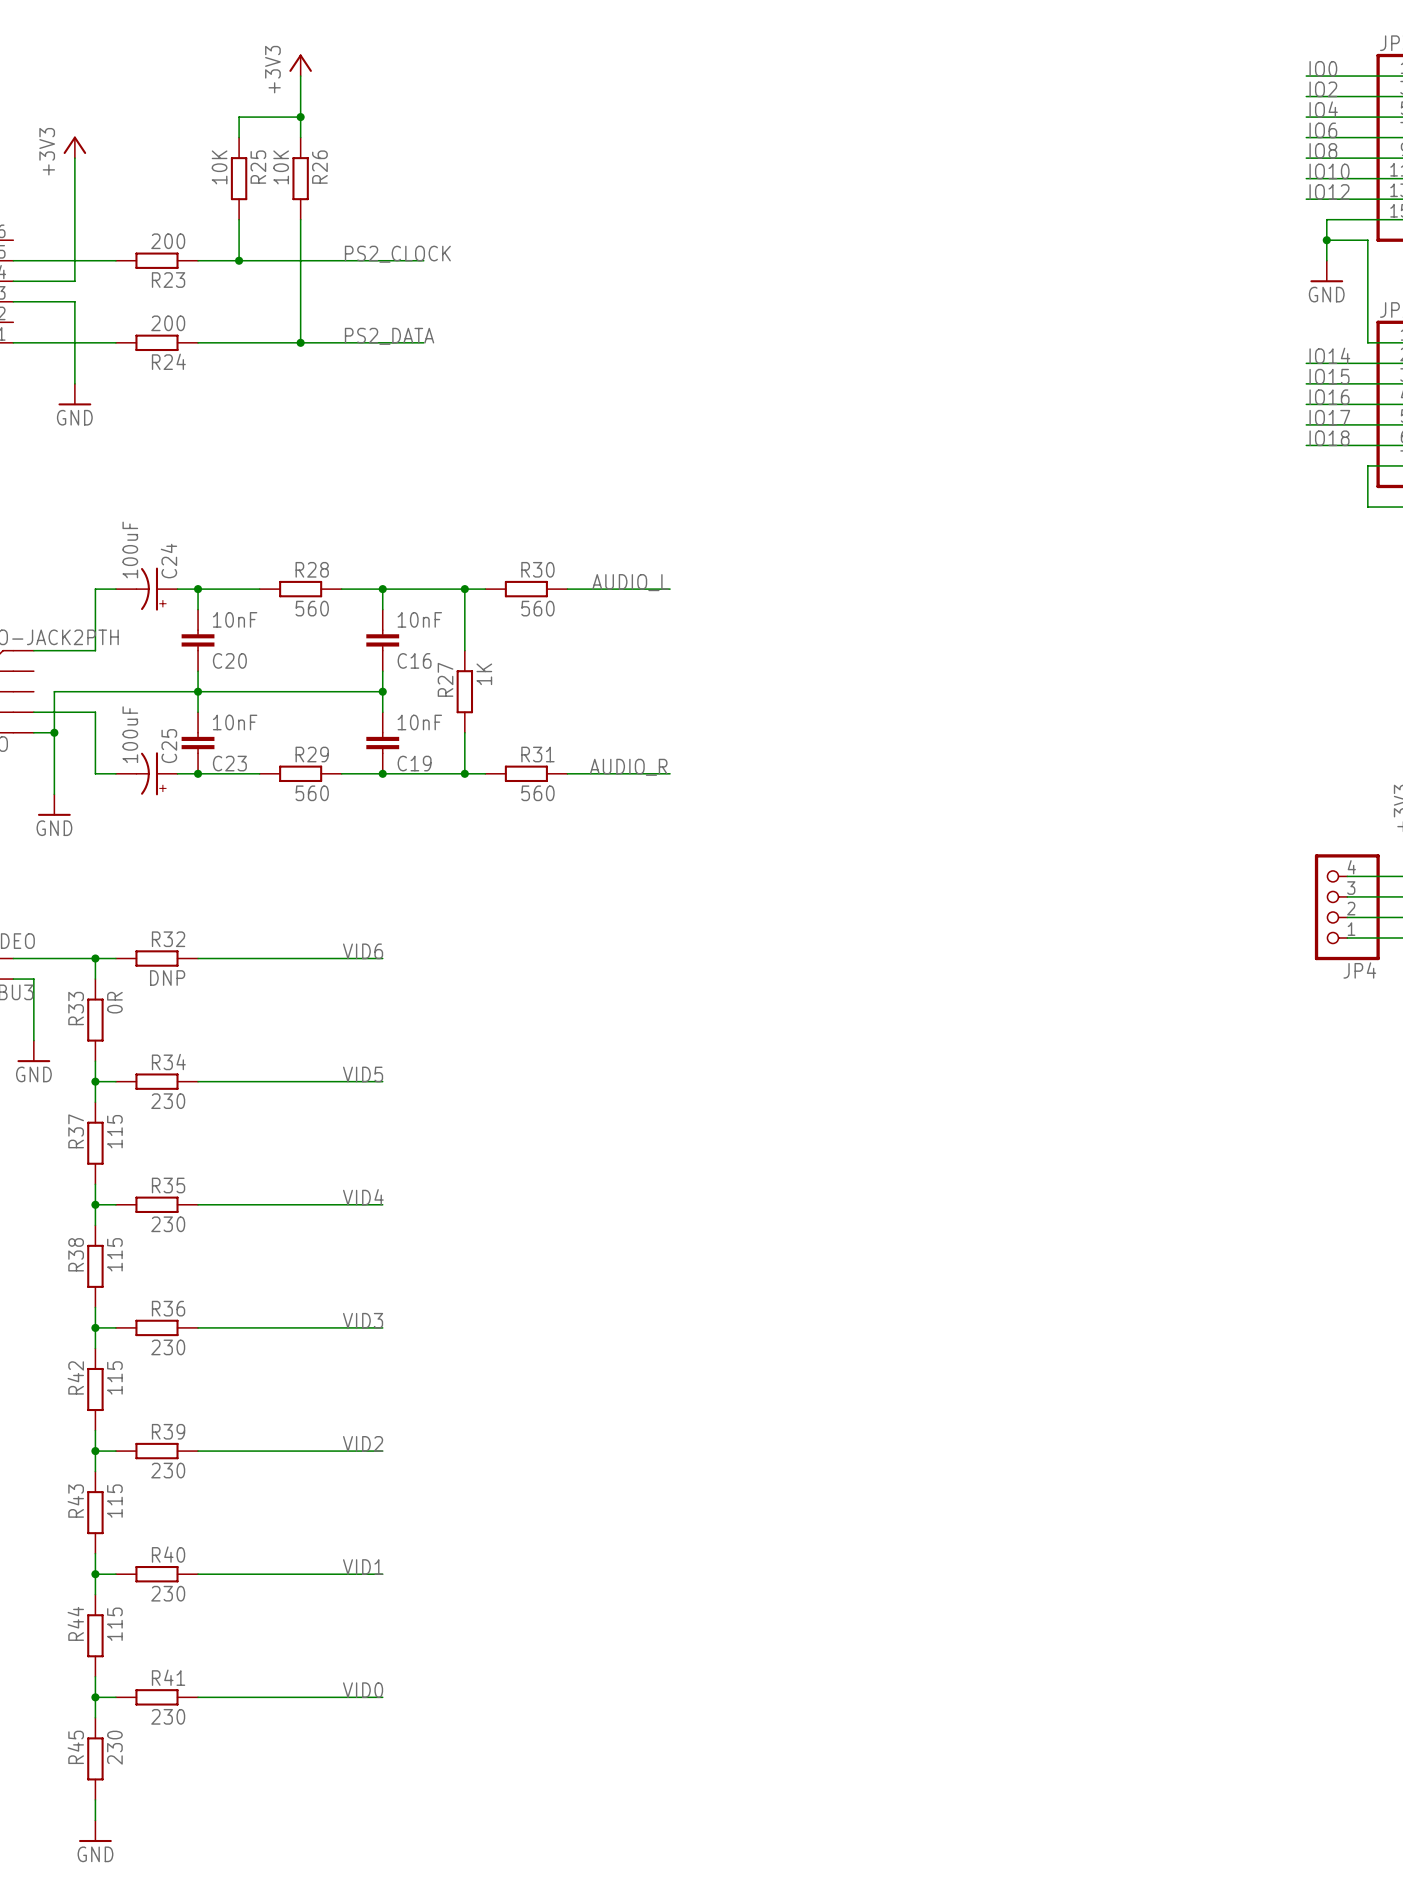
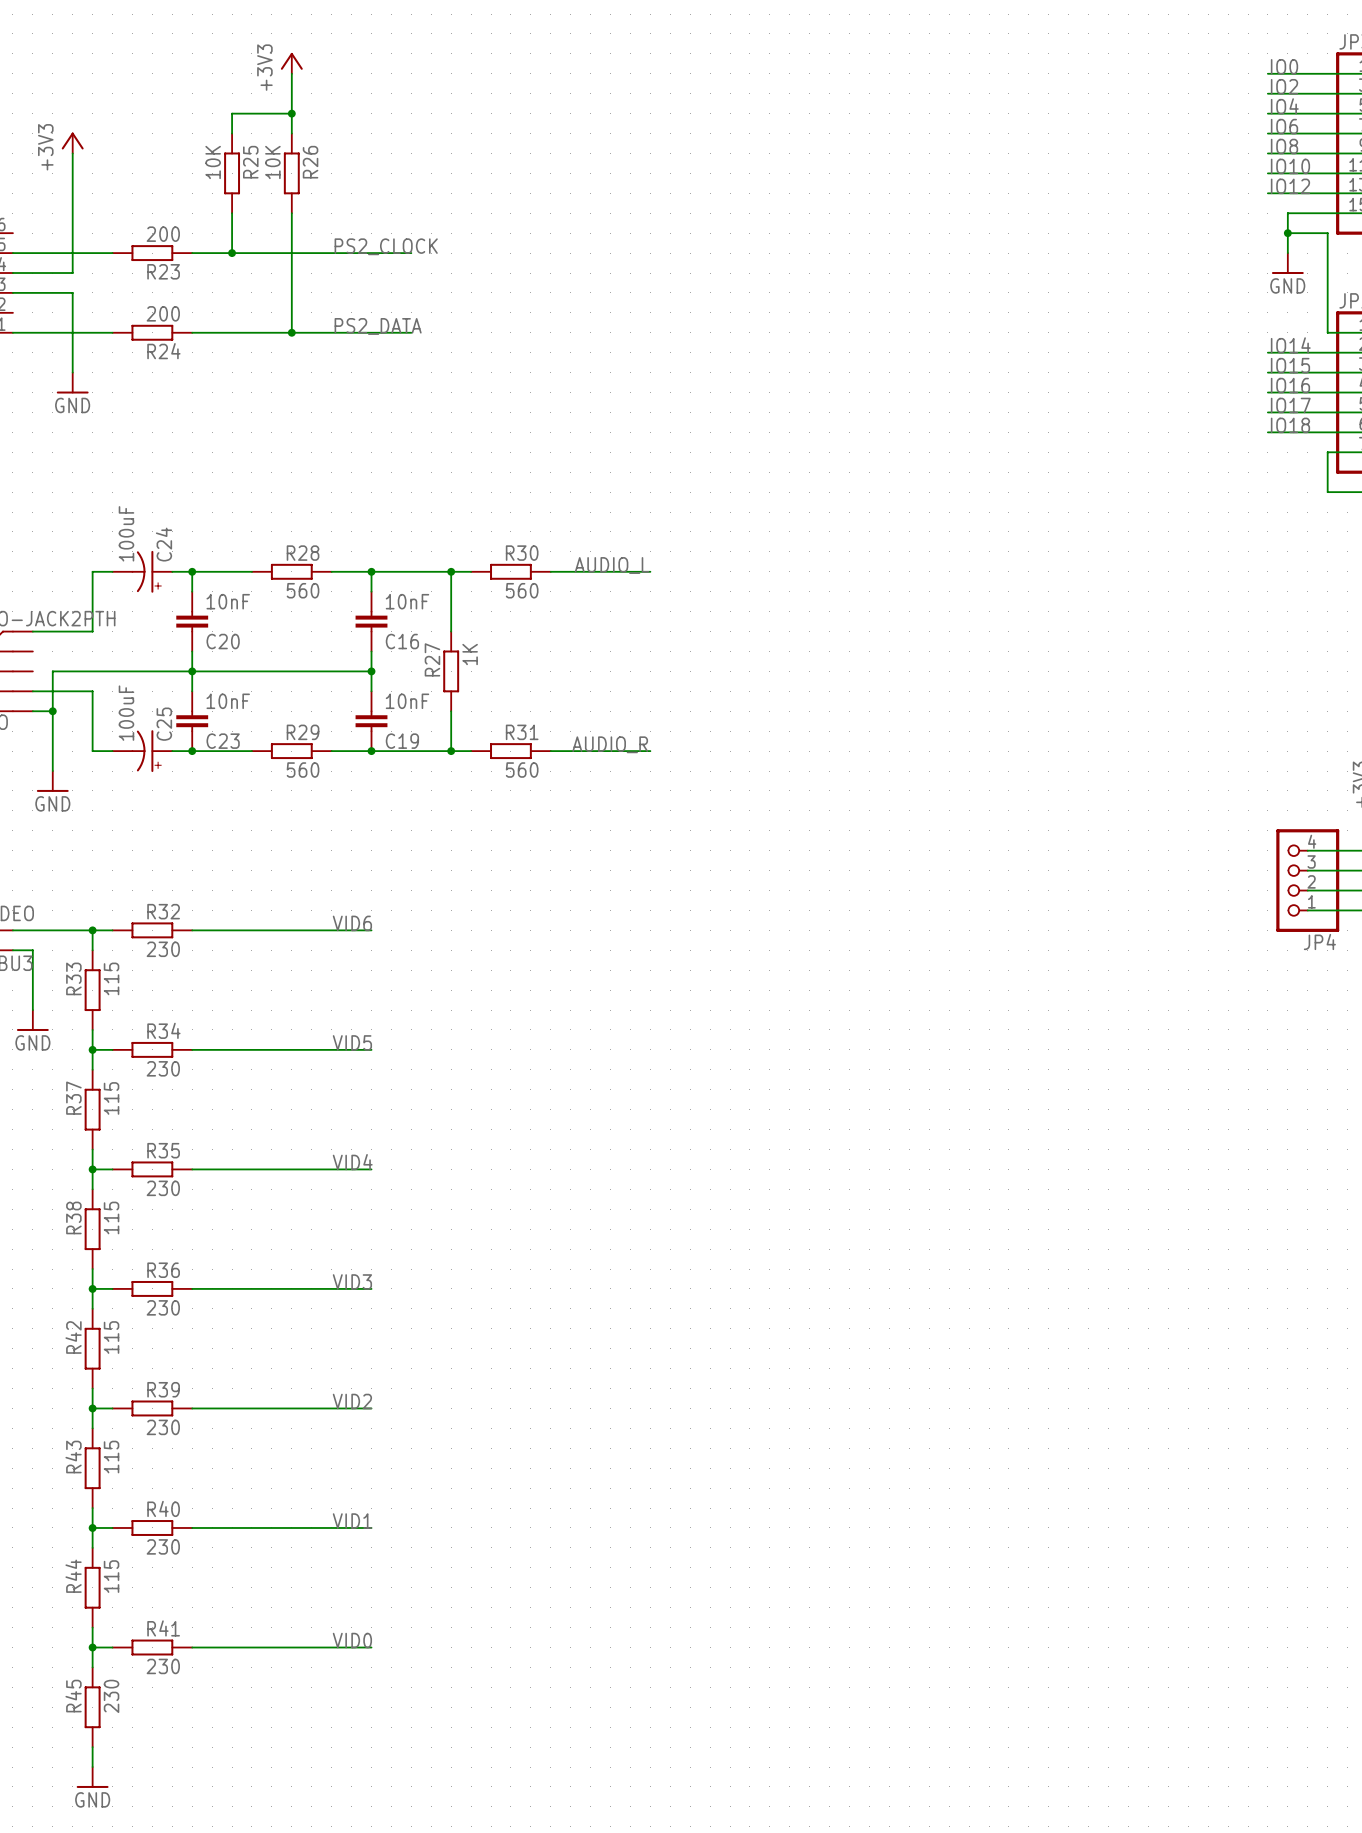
R32 value: DNP (167, 978) -> 230 (163, 949)
R33 value: 0R (114, 1002) -> 115 (111, 978)

